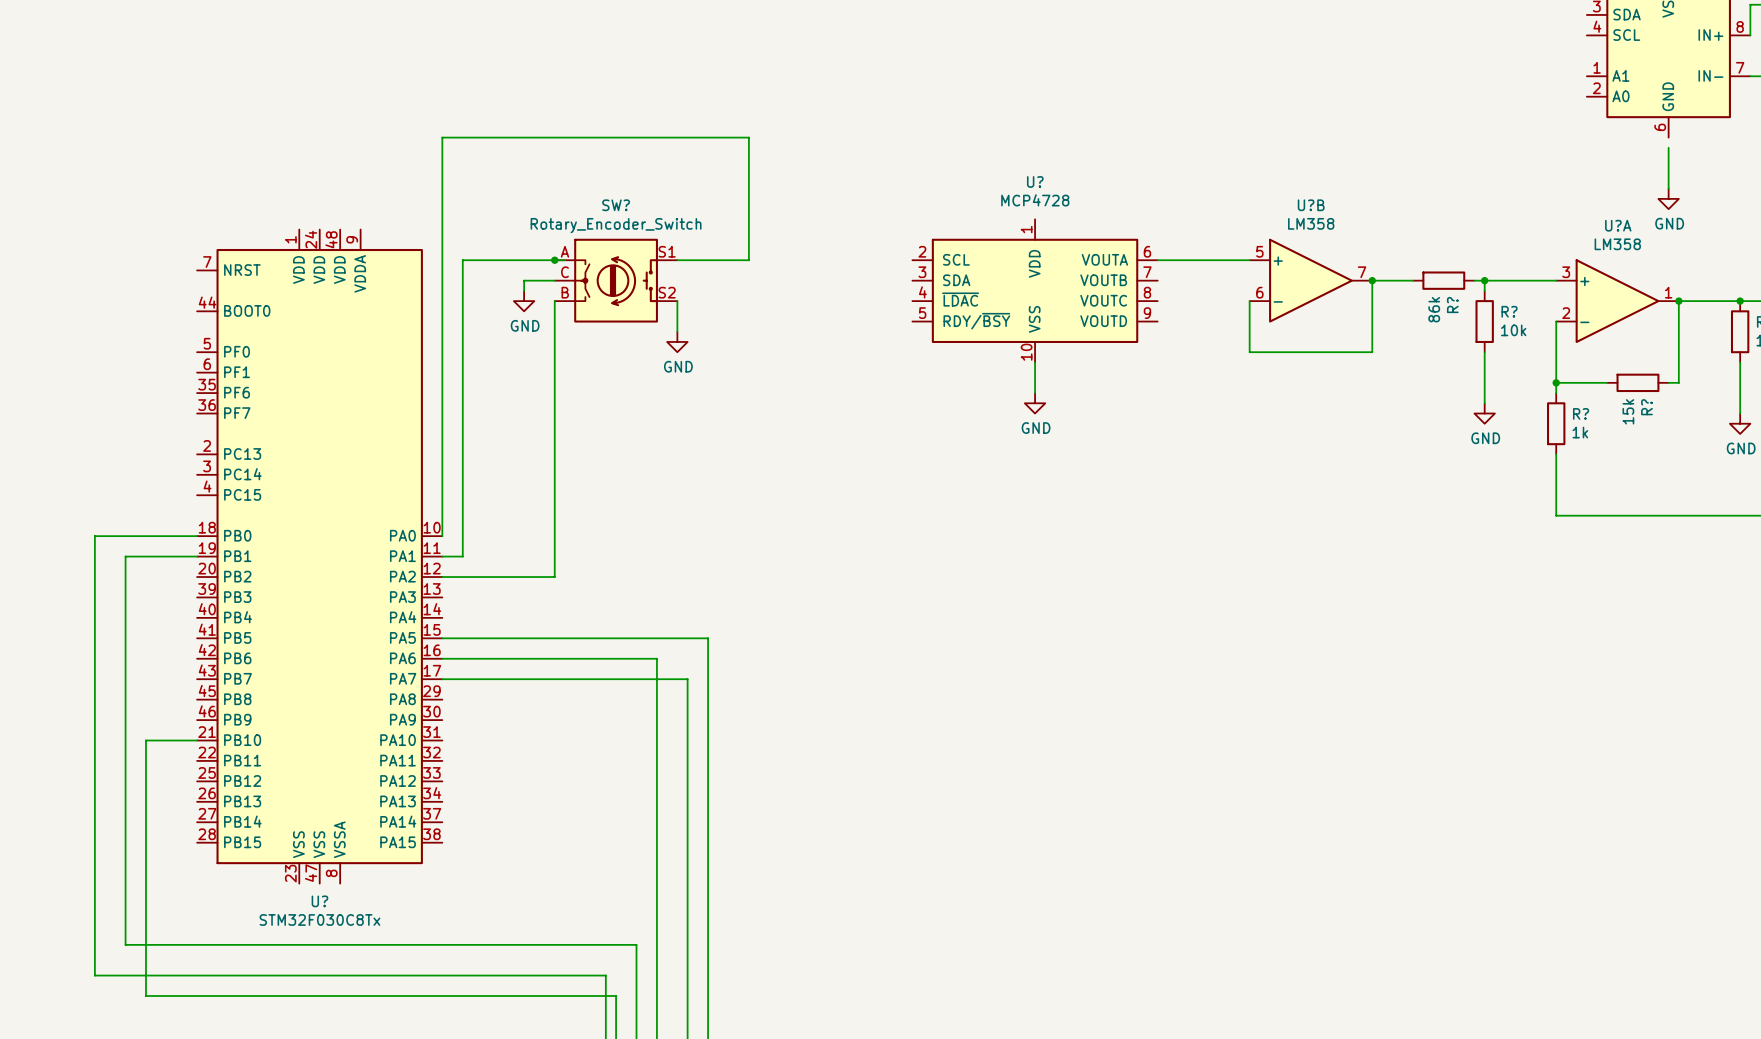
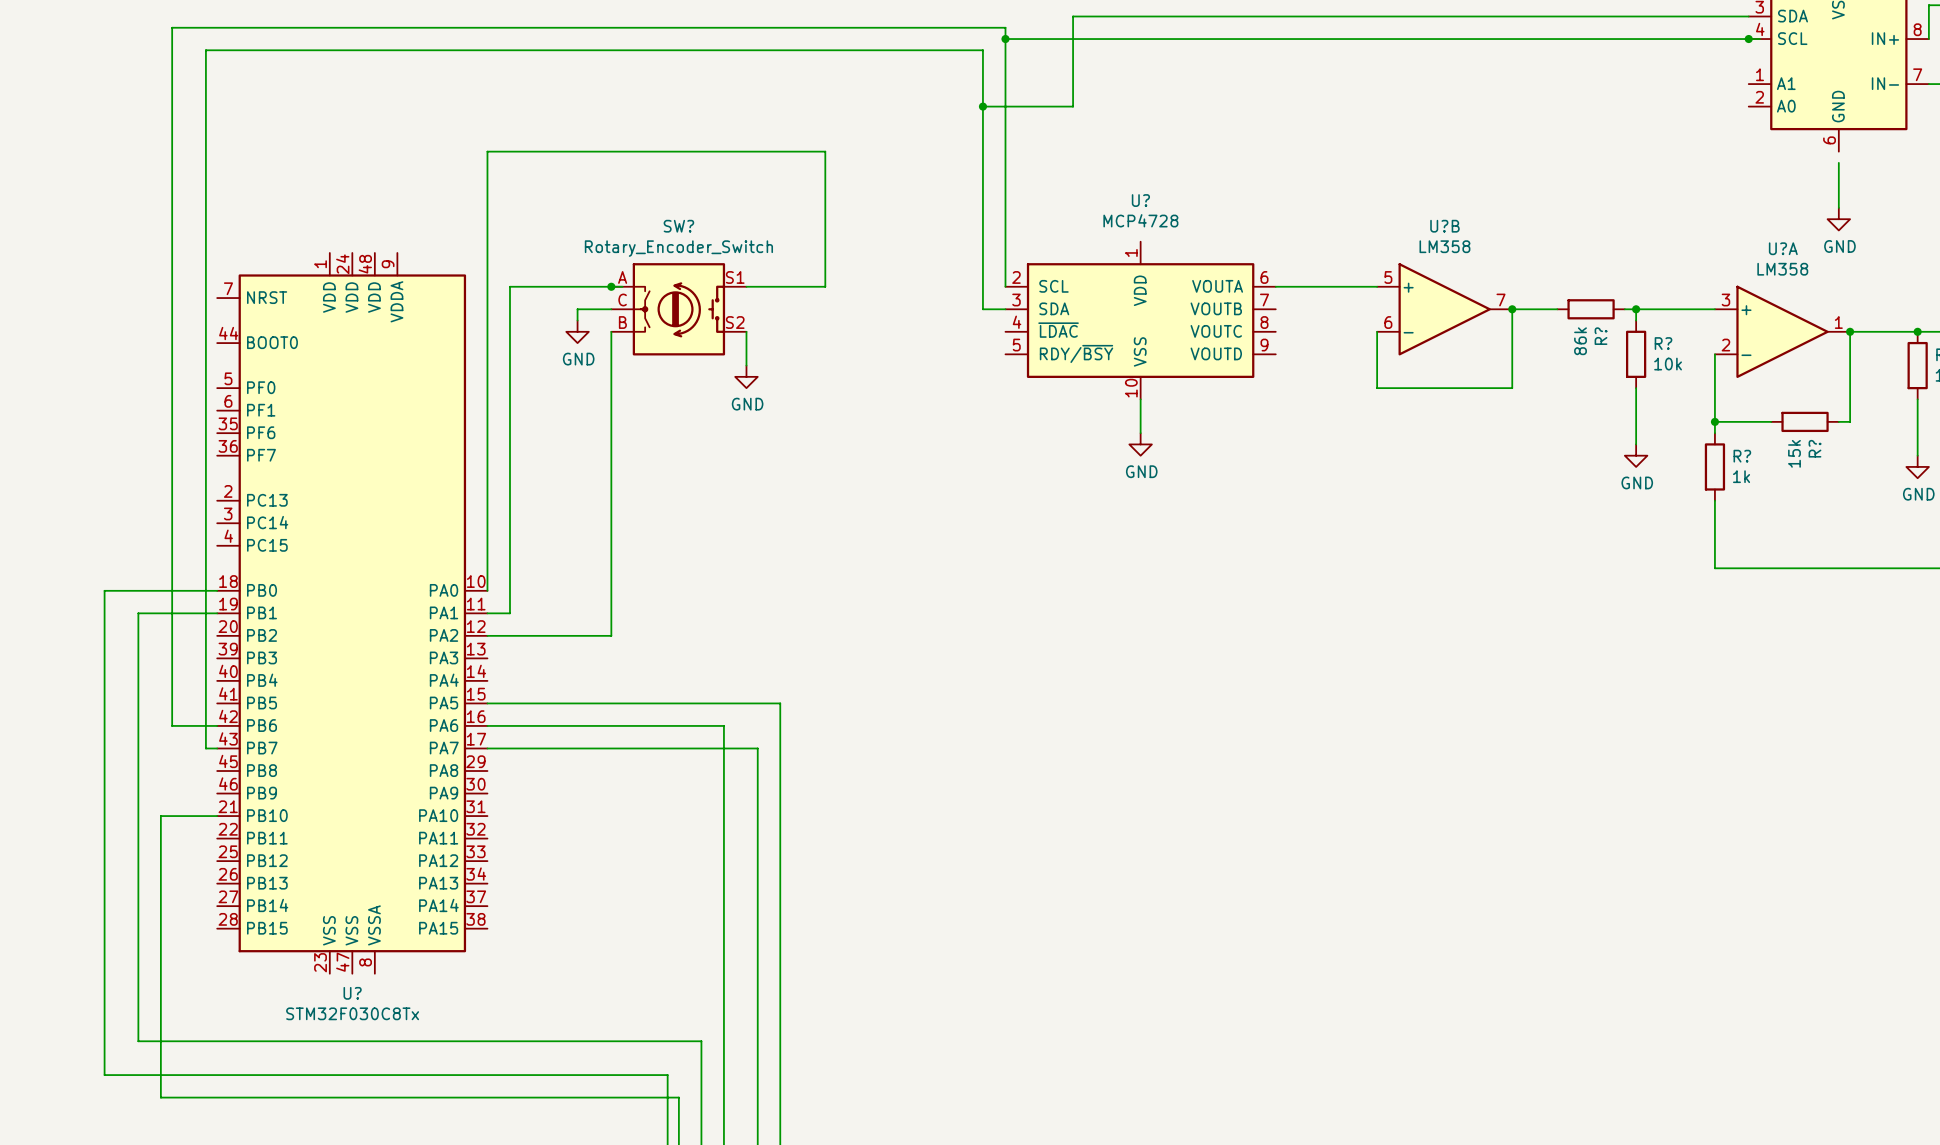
wire: none -> (1748, 16) (1073, 16) (1073, 106) (982, 106)
wire: none -> (1005, 39) (1760, 39)
junction: none -> (1005, 39)
junction: none -> (1748, 39)
junction: none -> (982, 106)
wire: none -> (1005, 286) (1005, 27) (172, 27) (172, 725) (217, 725)
wire: none -> (1005, 309) (982, 309) (982, 50) (205, 50) (205, 748) (217, 748)

